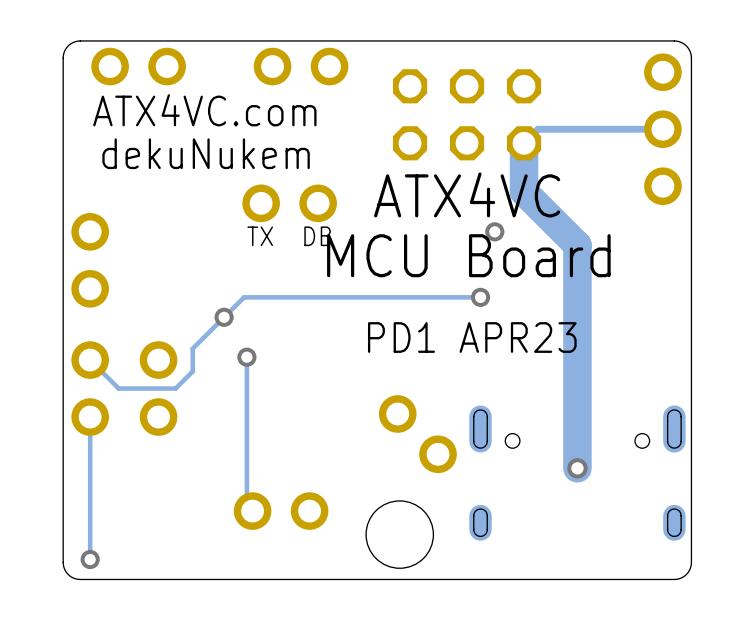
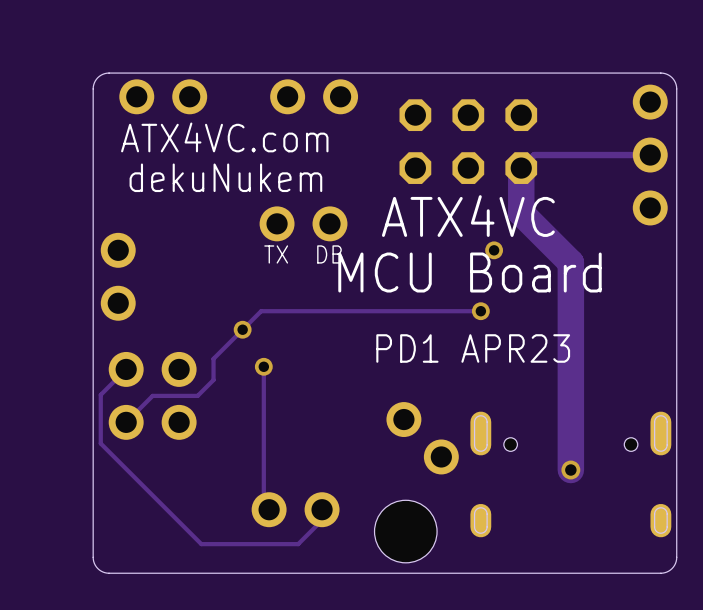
track: (90, 360) (118, 388) (127, 388) -> (126, 422) (152, 395)
track: none -> (126, 369) (100, 394) (100, 443) (201, 544) (298, 544) (322, 520) (322, 509)
part: none -> (152, 369)
part: (90, 388) -> none
part: (158, 388) -> none
track: (90, 417) (90, 559) -> none
part: none -> (152, 422)
via: (90, 559) -> none

